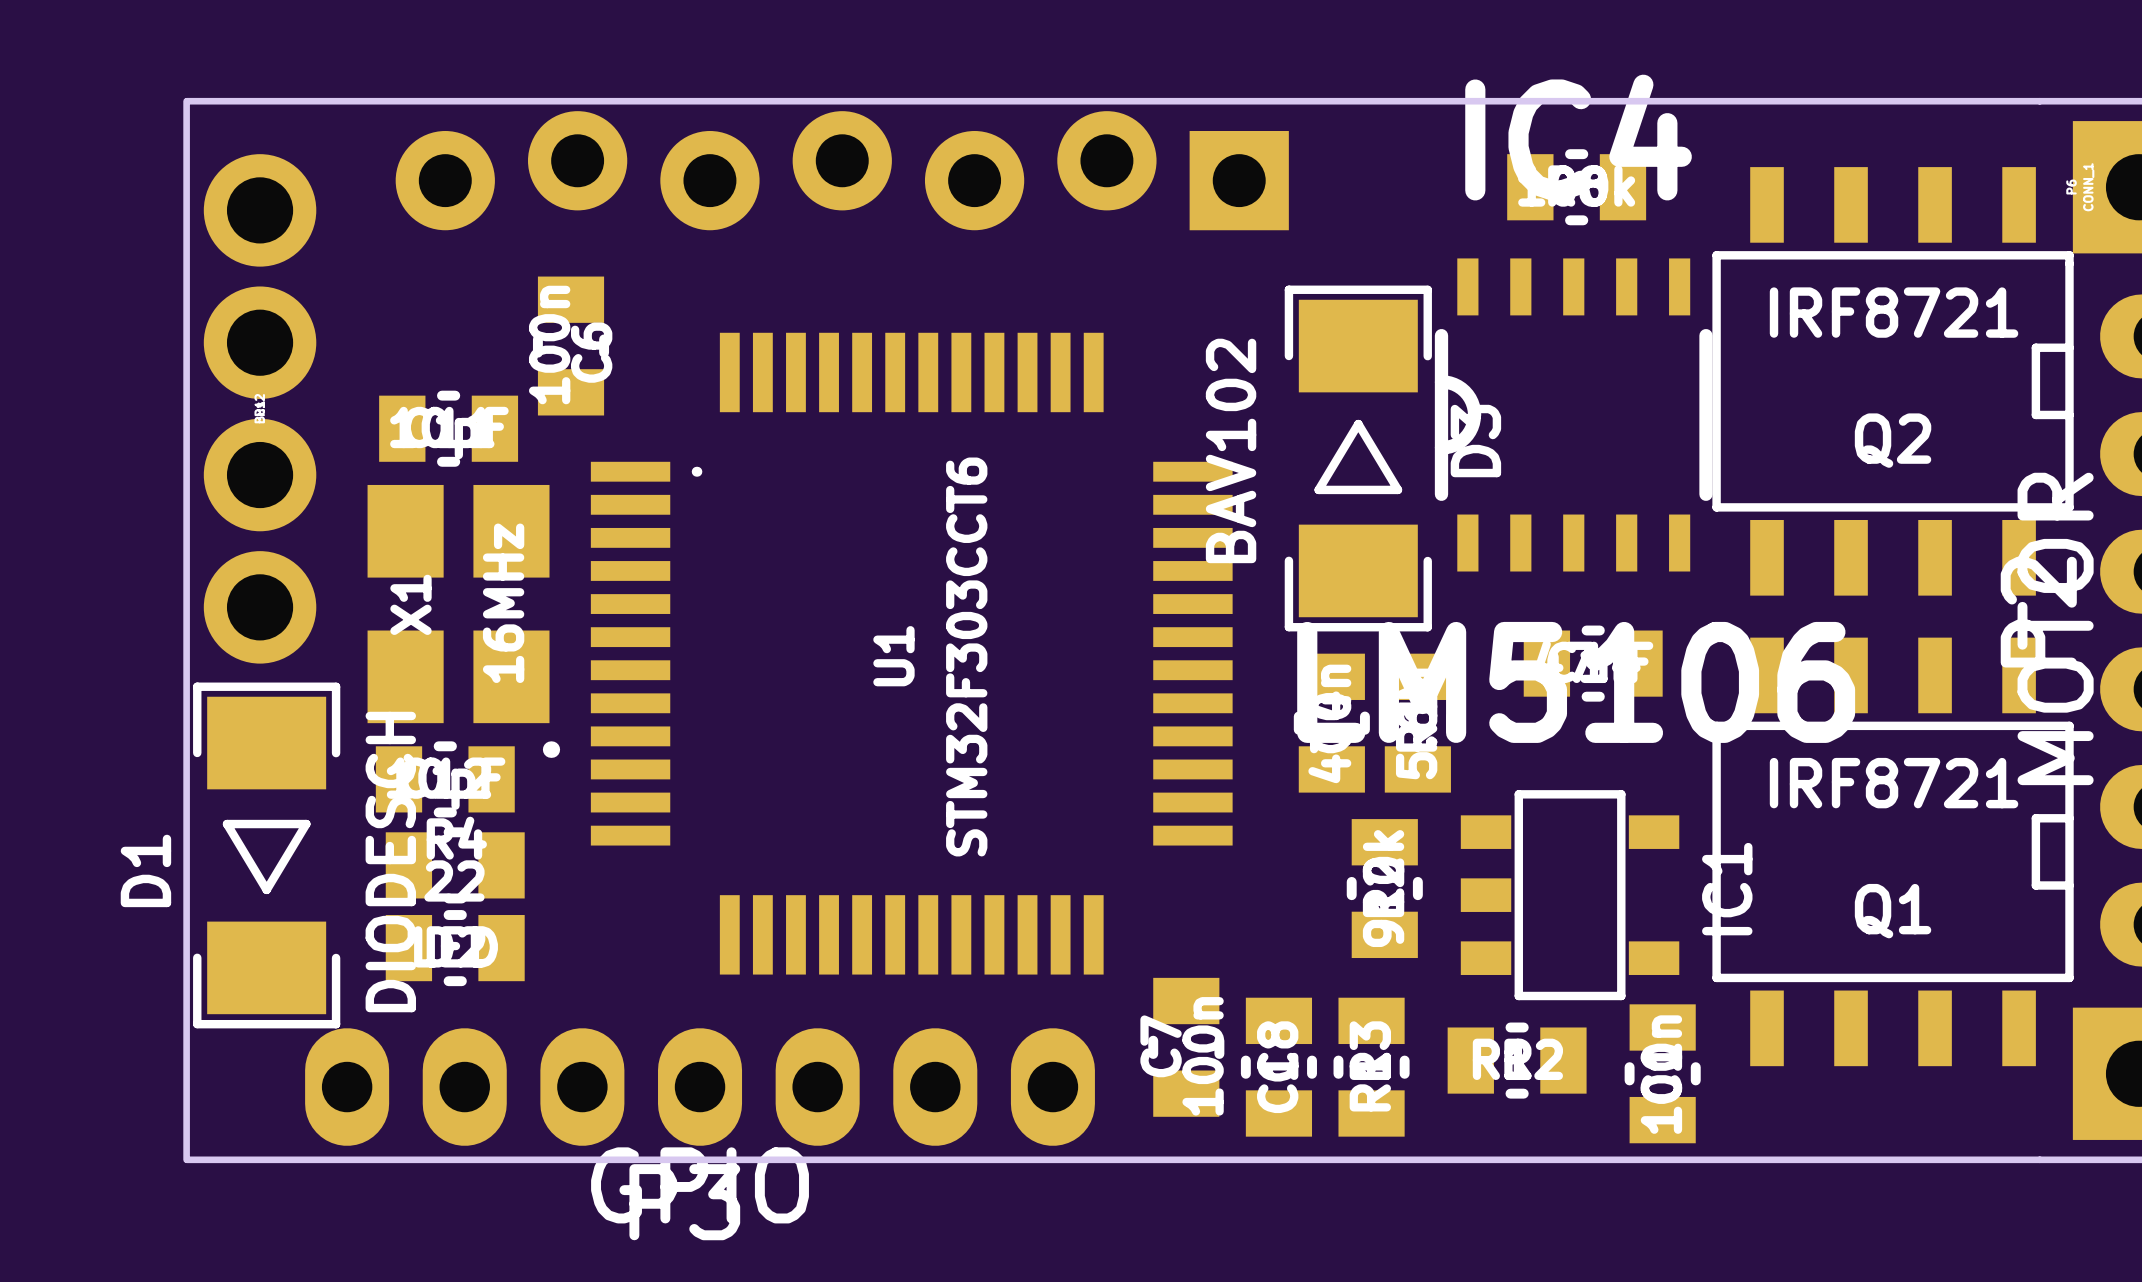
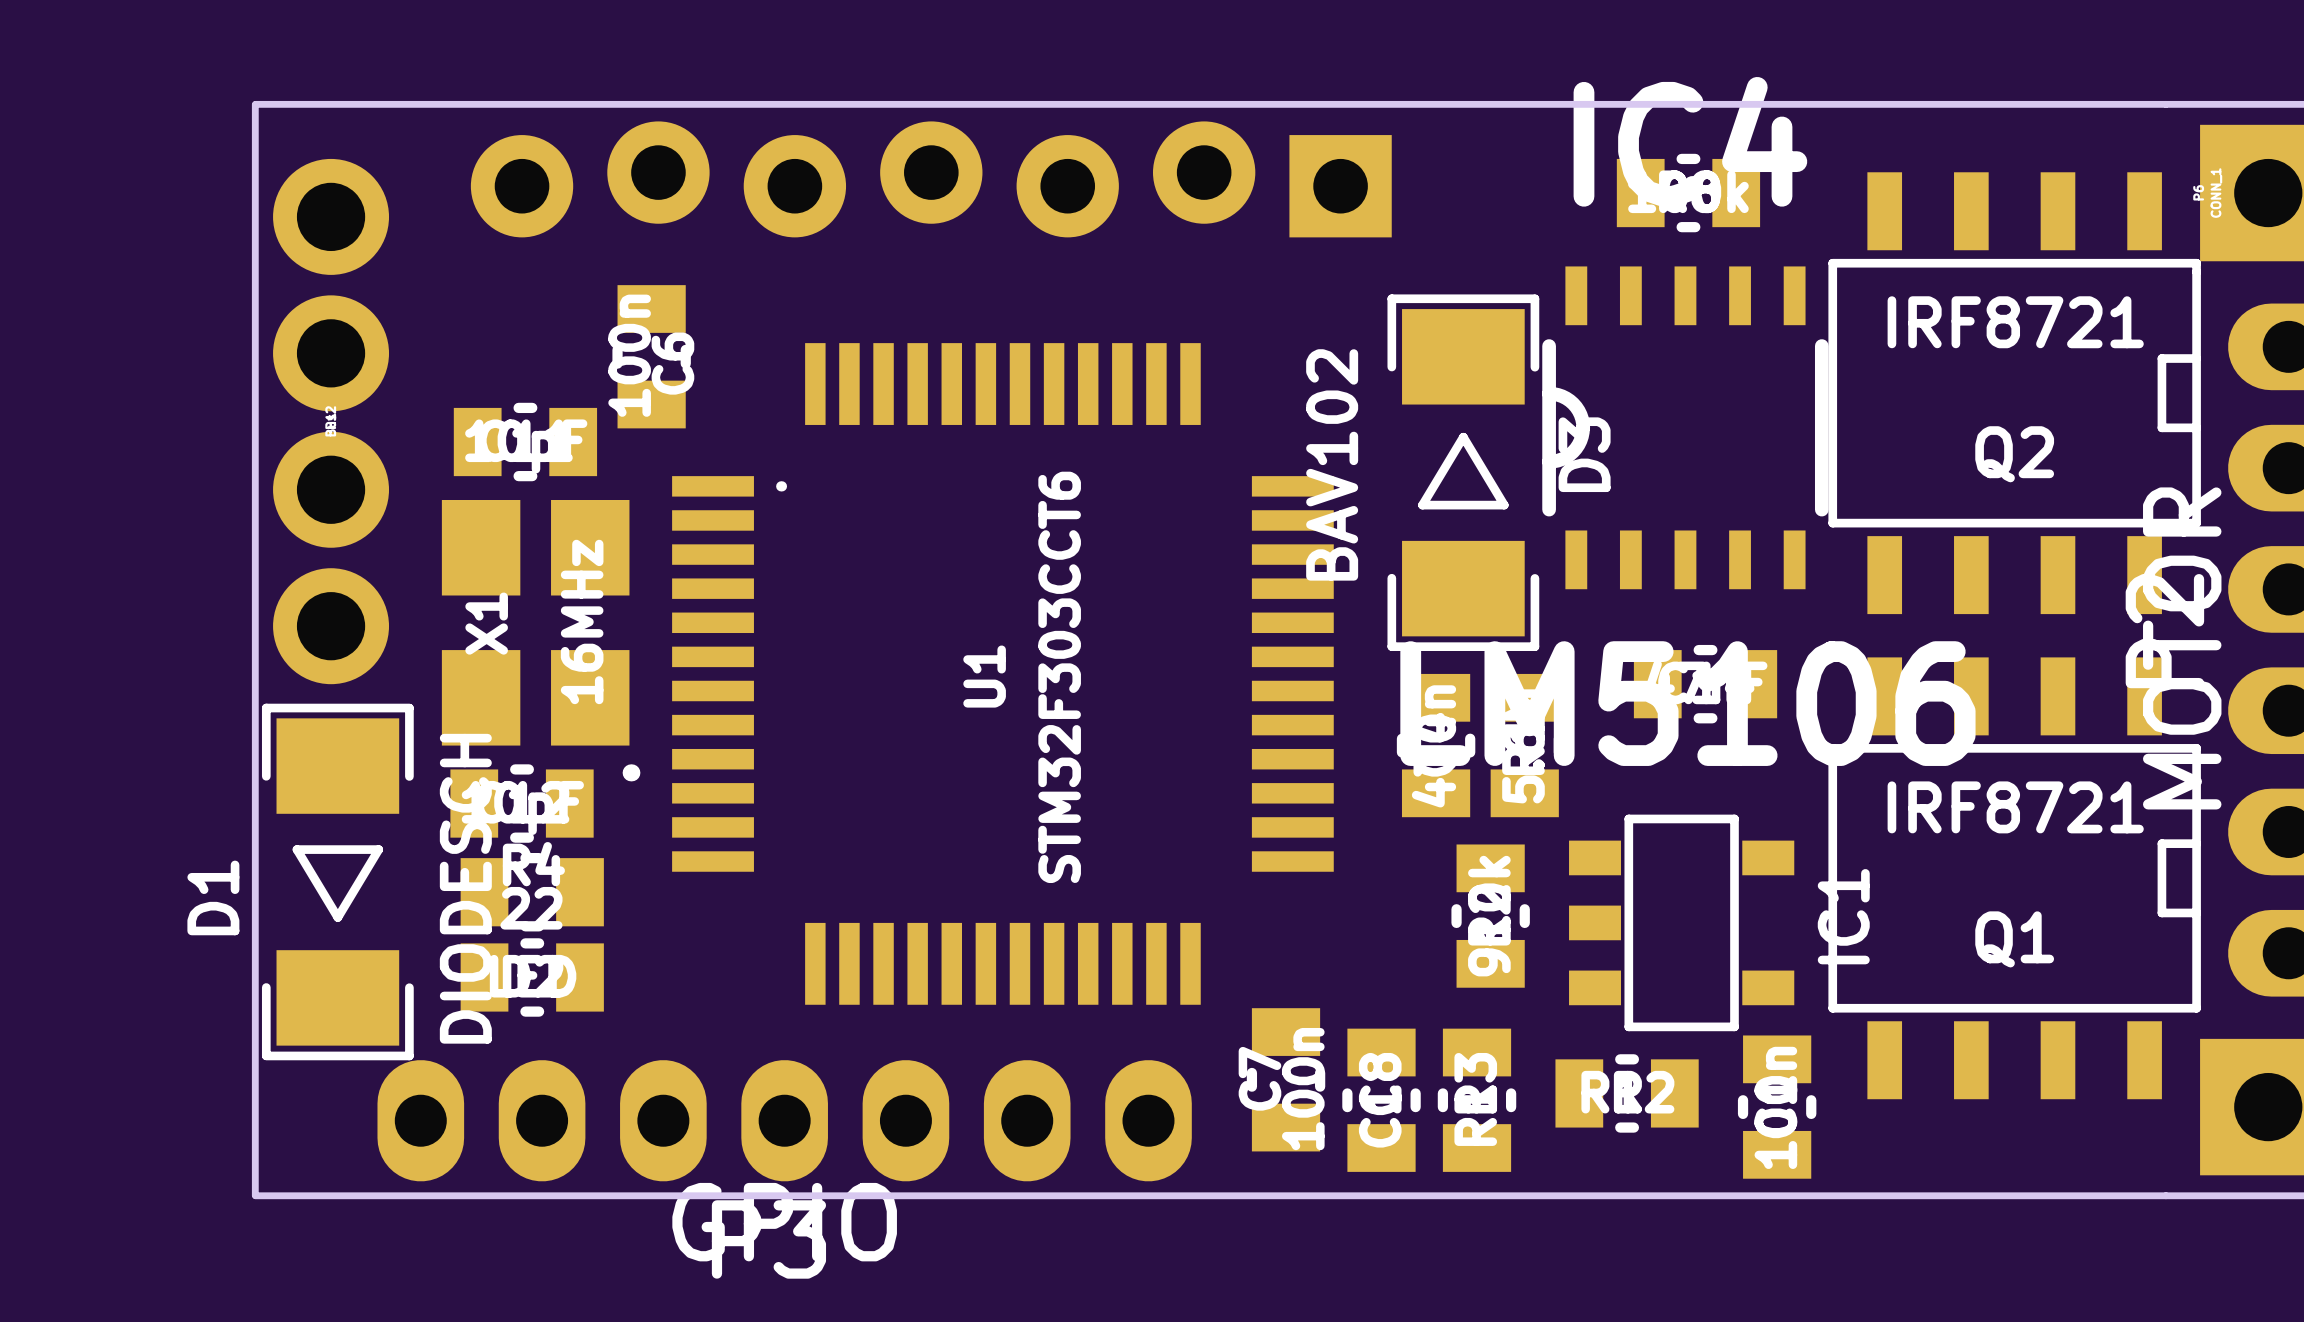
part footprint: [395, 111, 1289, 231] -> [470, 121, 1392, 238]

